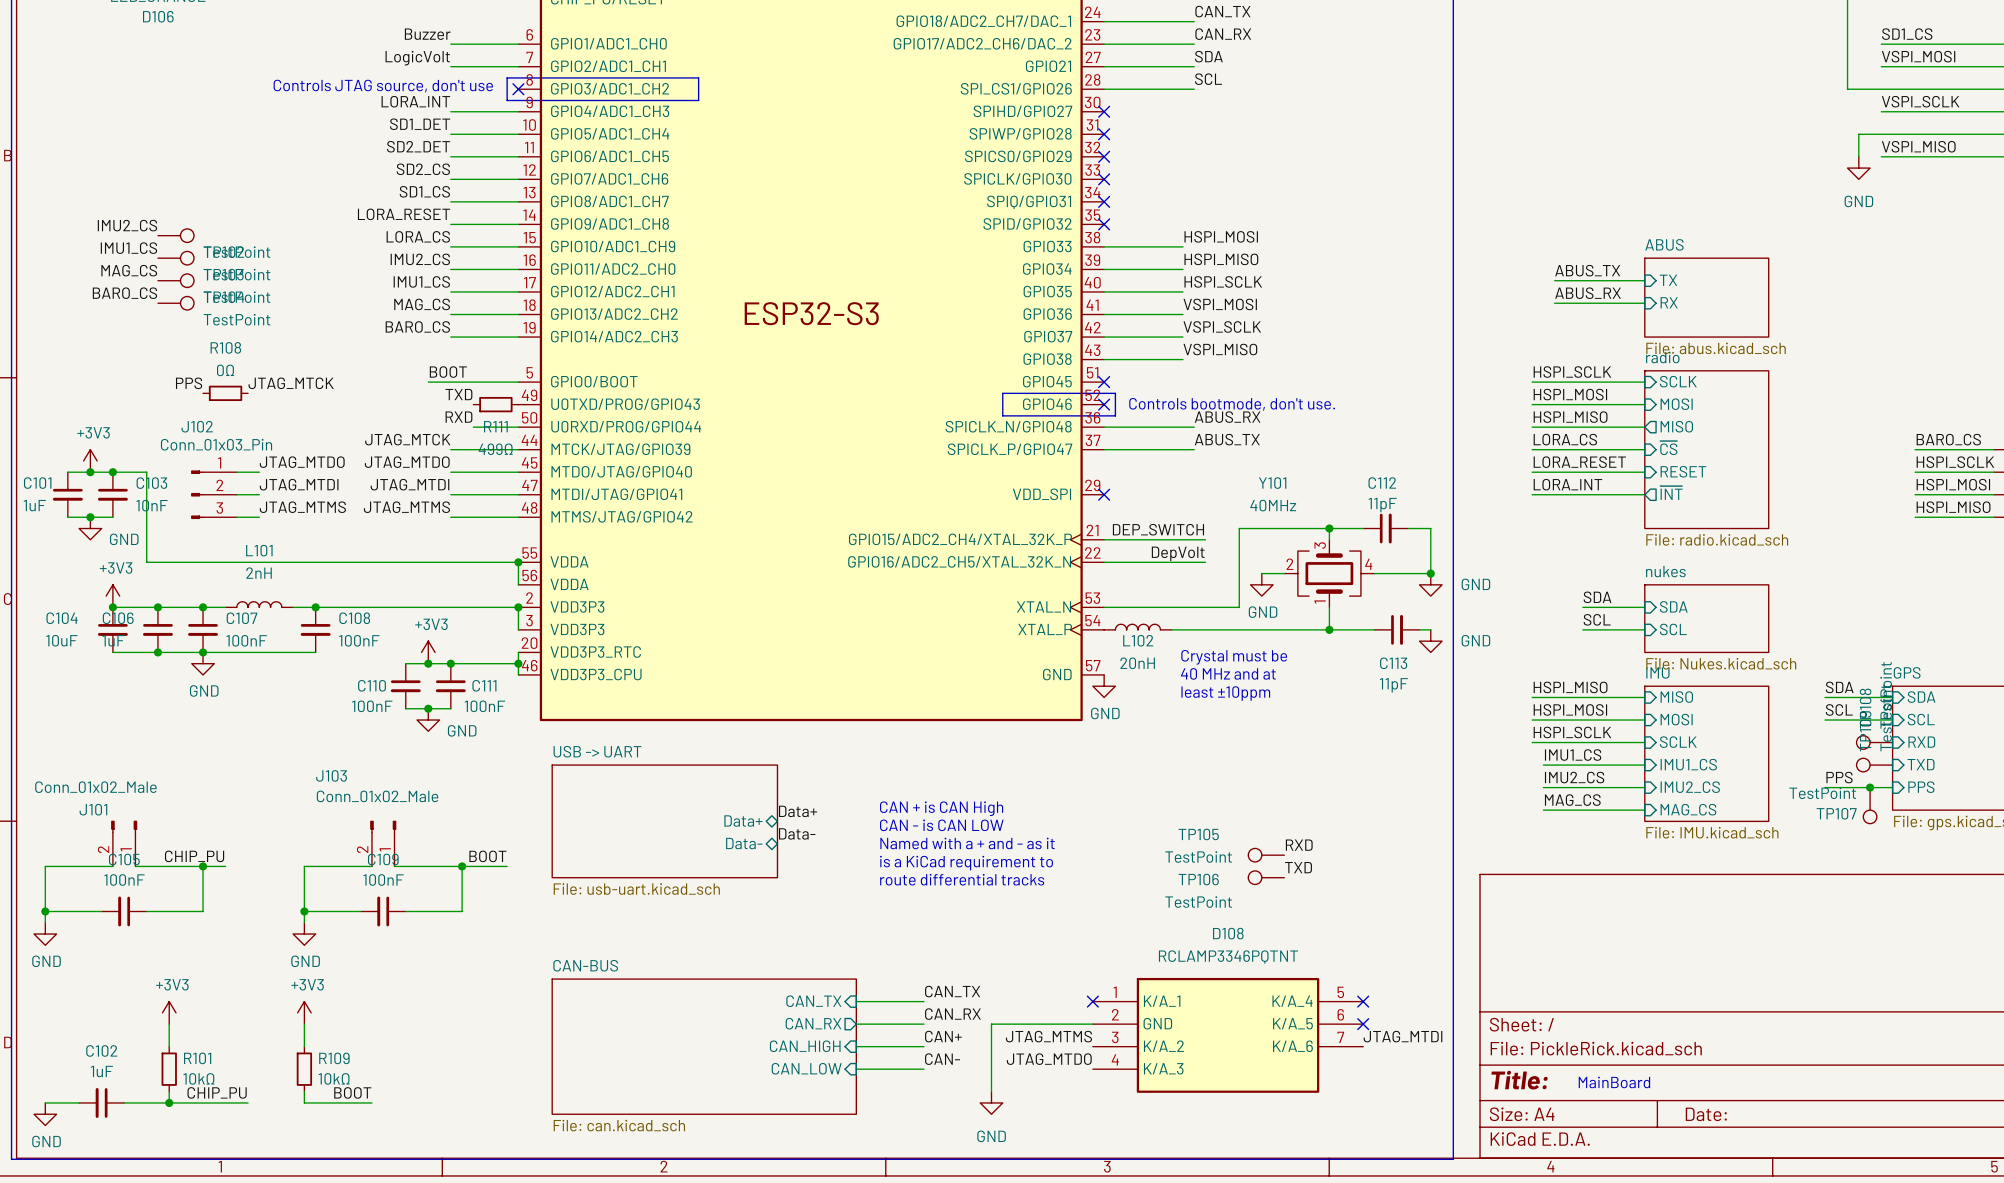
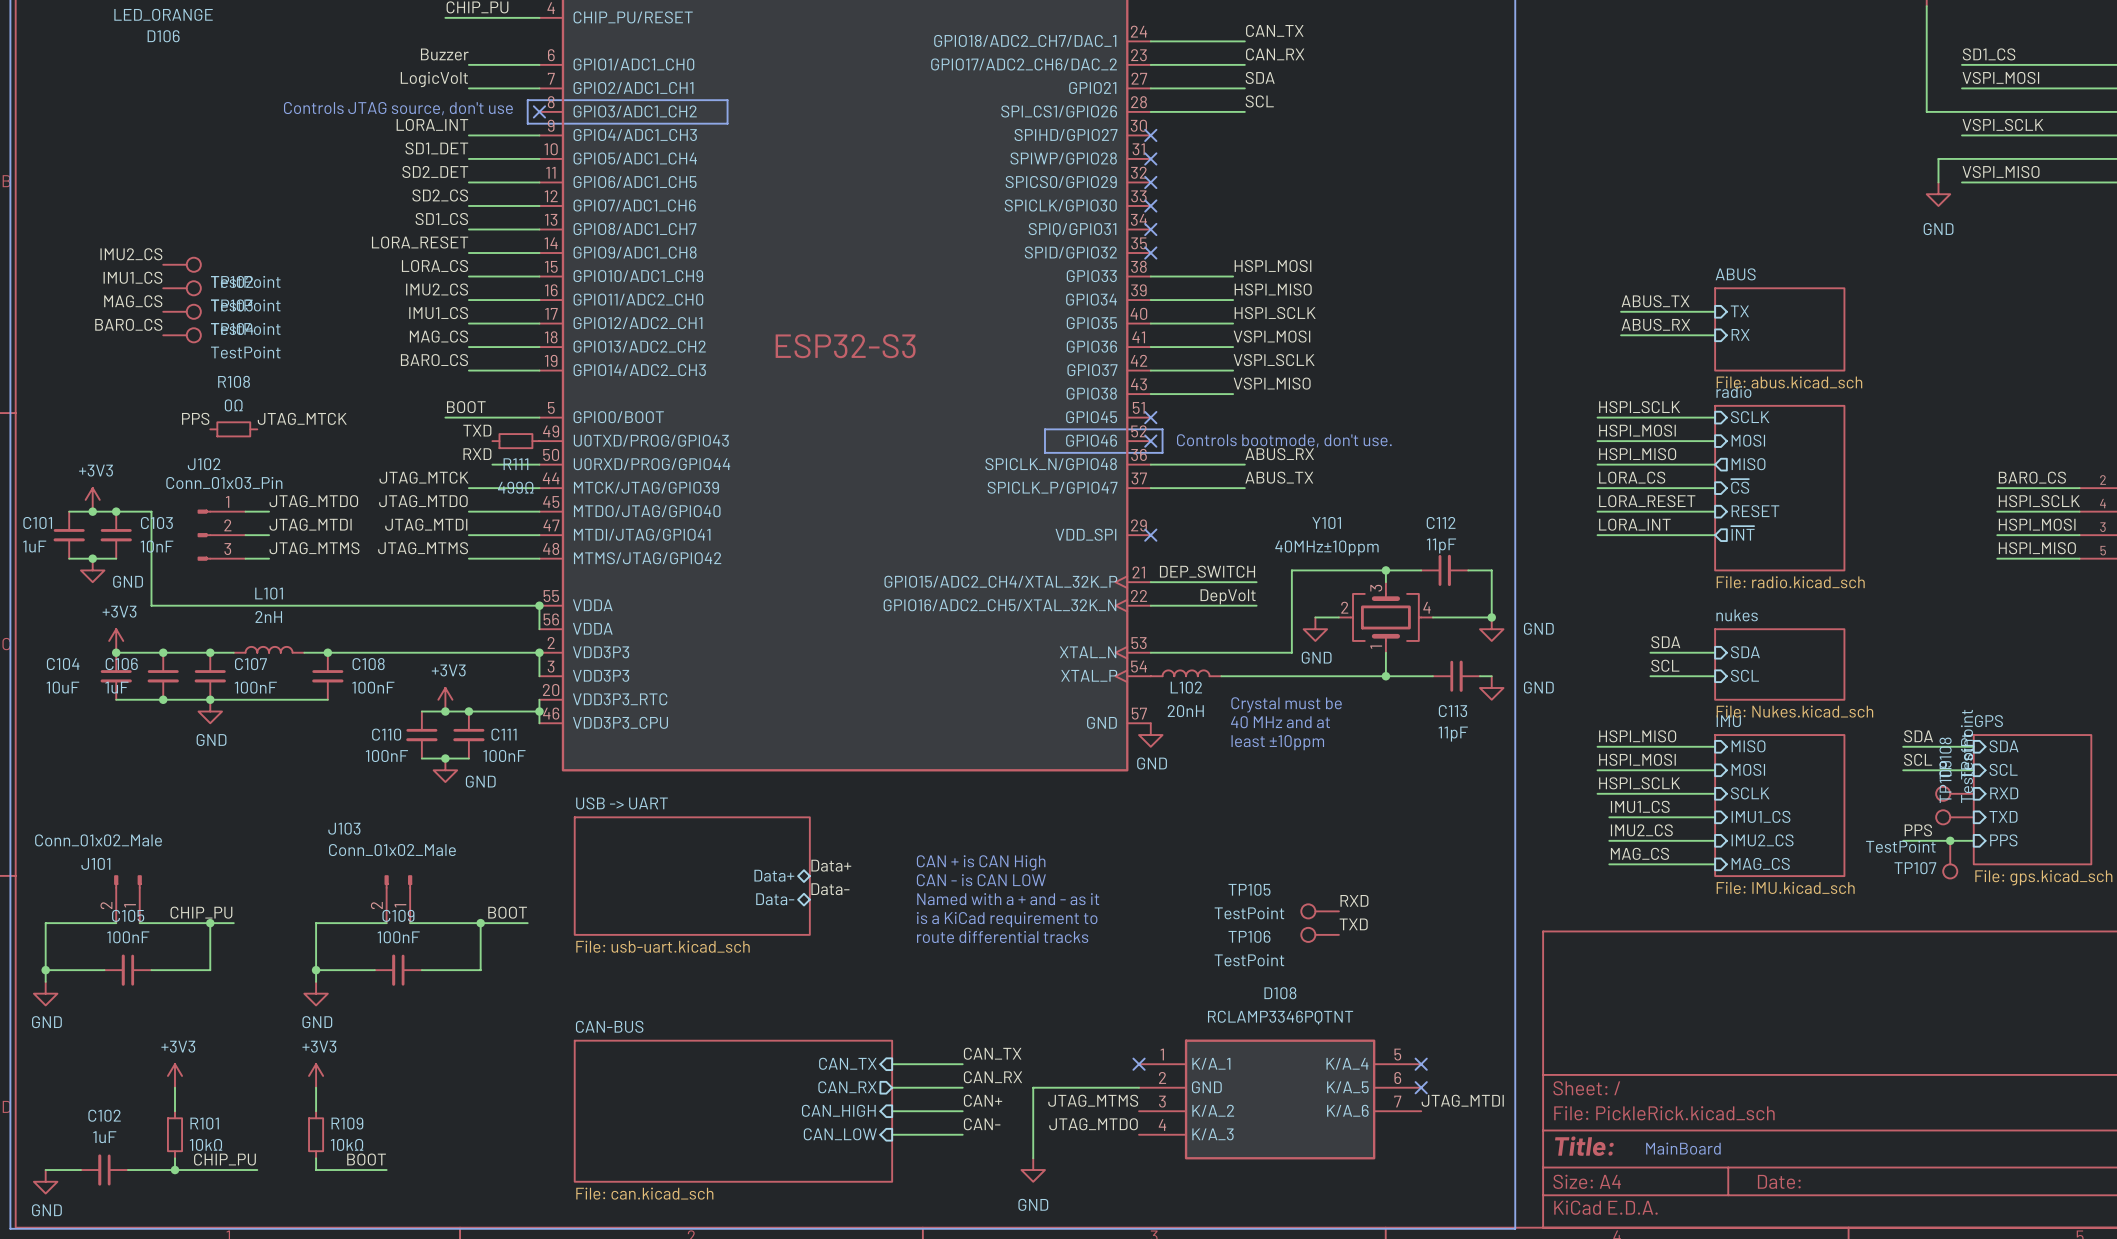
Y101 value: 40MHz (1273, 505) -> 40MHz±10ppm (1326, 548)

